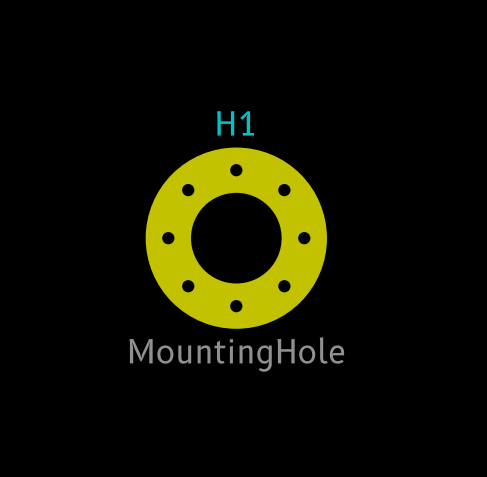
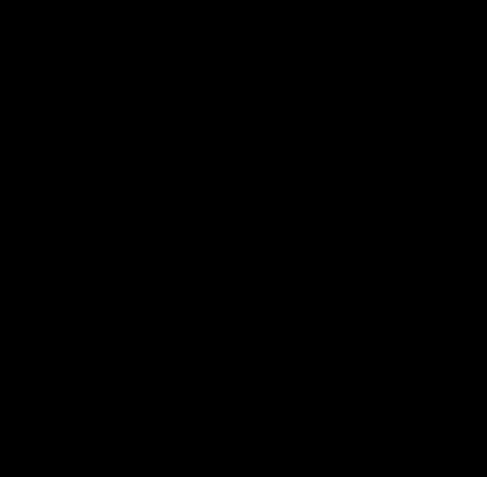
H1: MountingHole (236, 238) -> none

